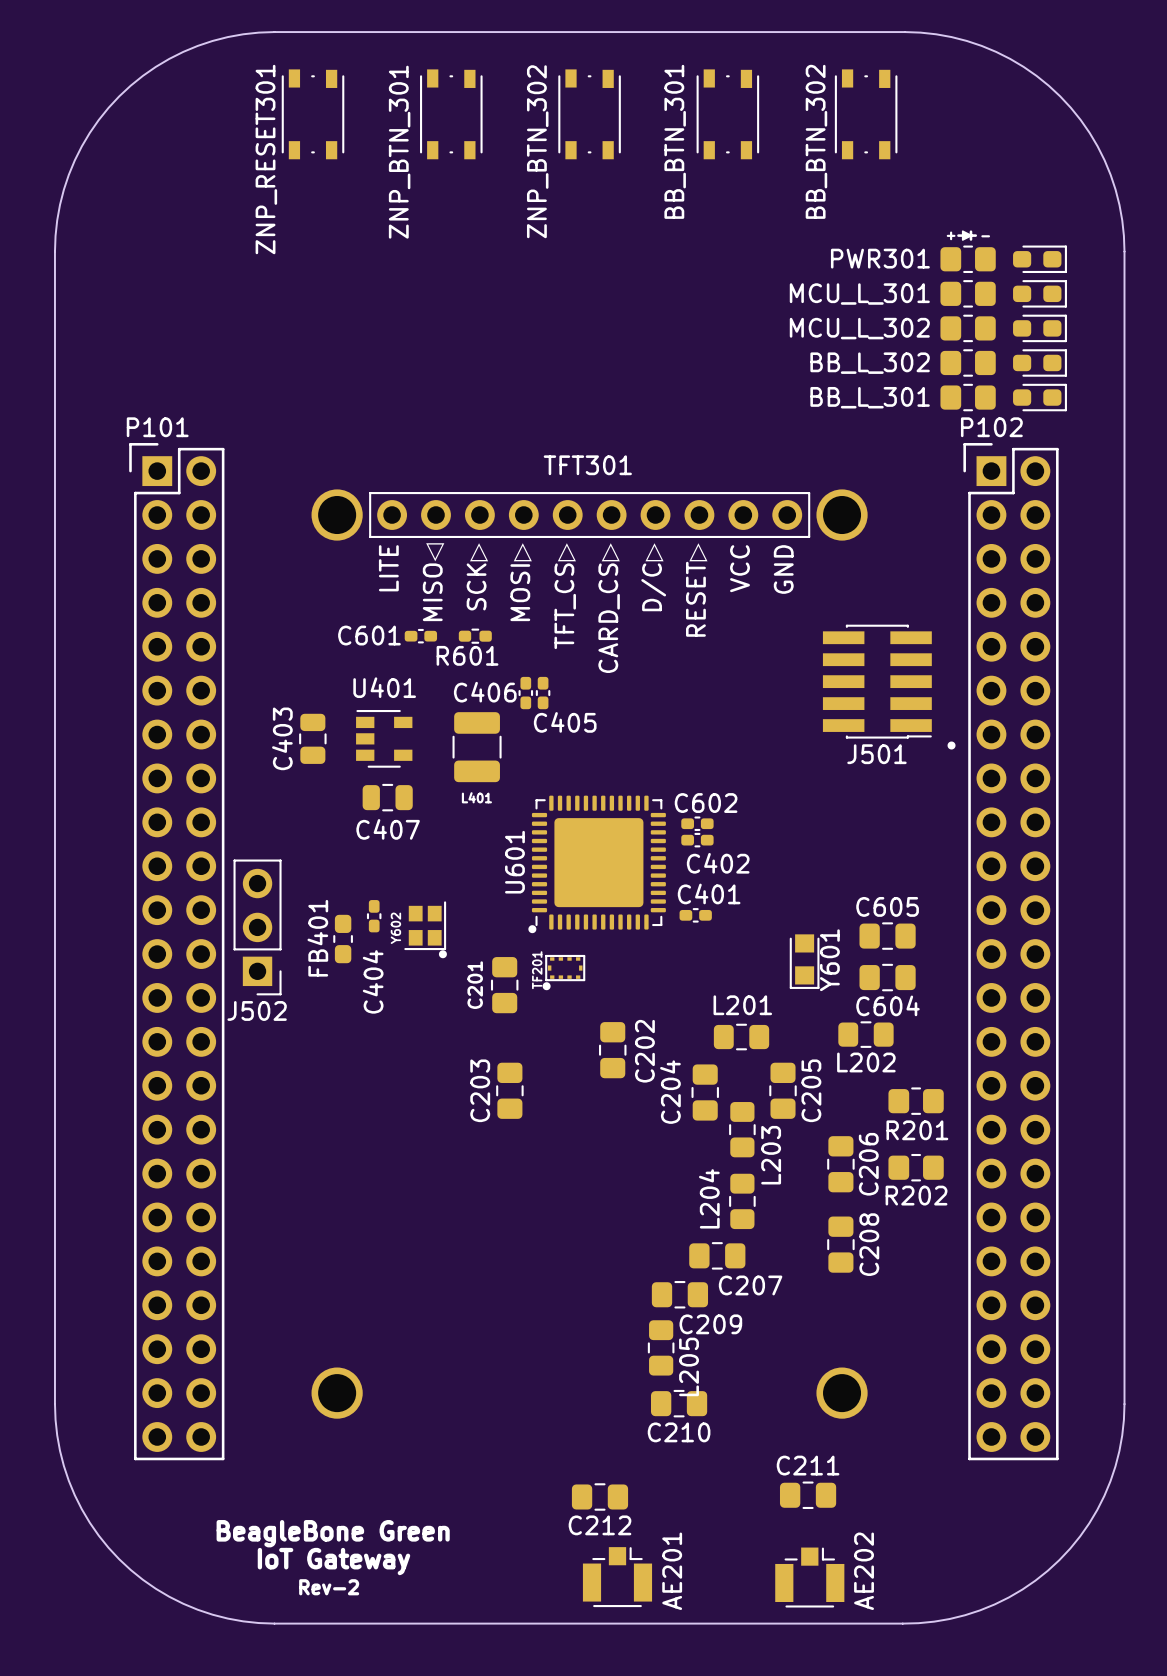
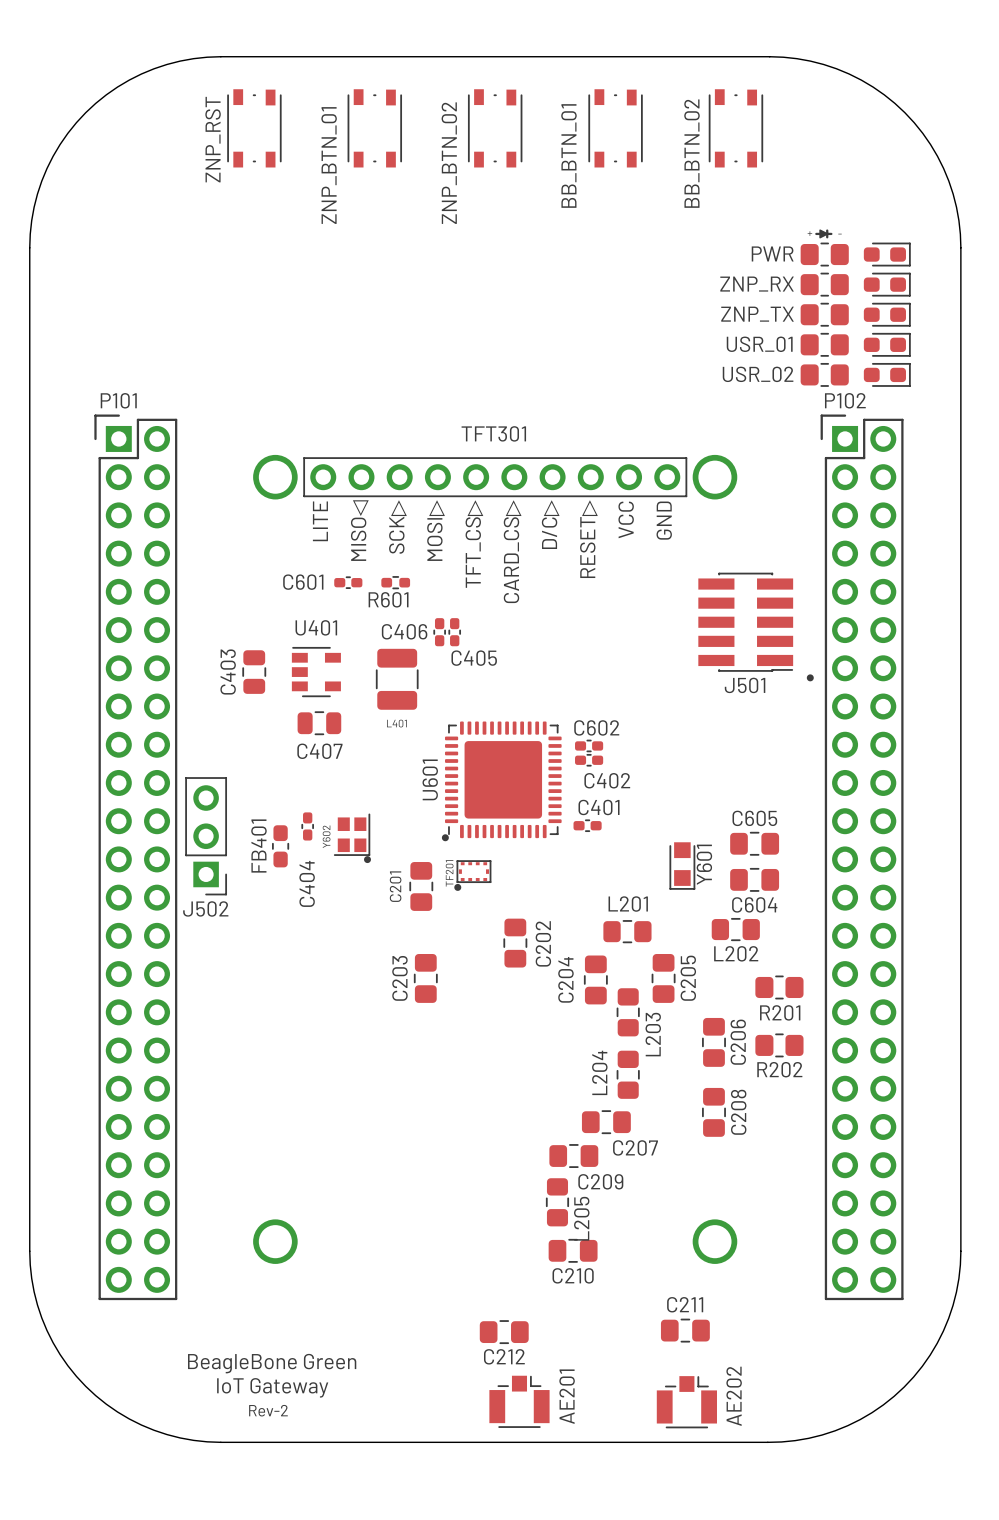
BB_BTN_301 name: BB_BTN_301 (675, 141) -> BB_BTN_01 (568, 155)
BB_BTN_302 name: BB_BTN_302 (816, 141) -> BB_BTN_02 (691, 153)
ZNP_BTN_302 name: ZNP_BTN_302 (537, 151) -> ZNP_BTN_02 (449, 163)
ZNP_BTN_301 name: ZNP_BTN_301 (399, 152) -> ZNP_BTN_01 (329, 165)
ZNP_RESET301 name: ZNP_RESET301 (266, 159) -> ZNP_RST (213, 139)
PWR301 name: PWR301 (880, 258) -> PWR (772, 253)
MCU_L_301 name: MCU_L_301 (859, 294) -> ZNP_RX (757, 284)
MCU_L_302 name: MCU_L_302 (859, 328) -> ZNP_TX (757, 314)
BB_L_302 name: BB_L_302 (870, 363) -> USR_01 (759, 344)
BB_L_301 name: BB_L_301 (870, 397) -> USR_02 (758, 374)

